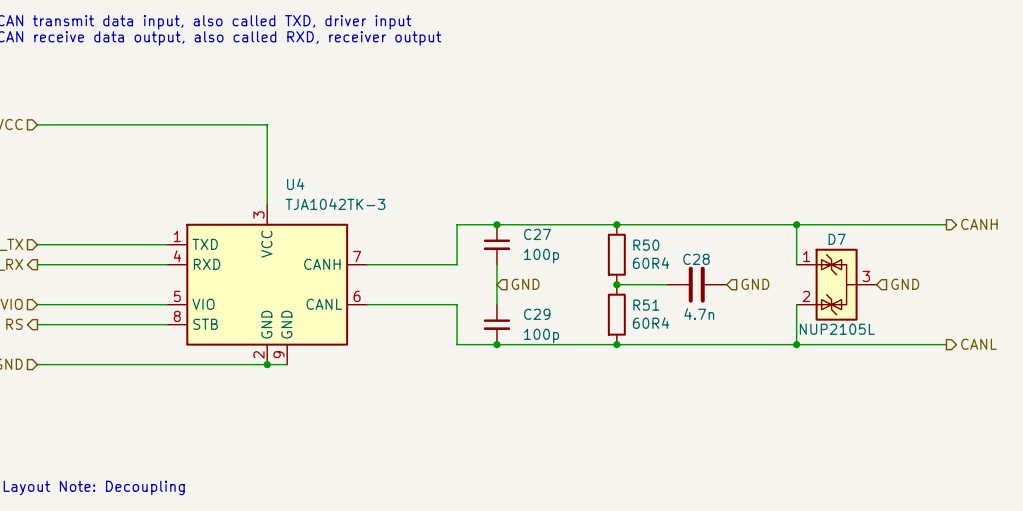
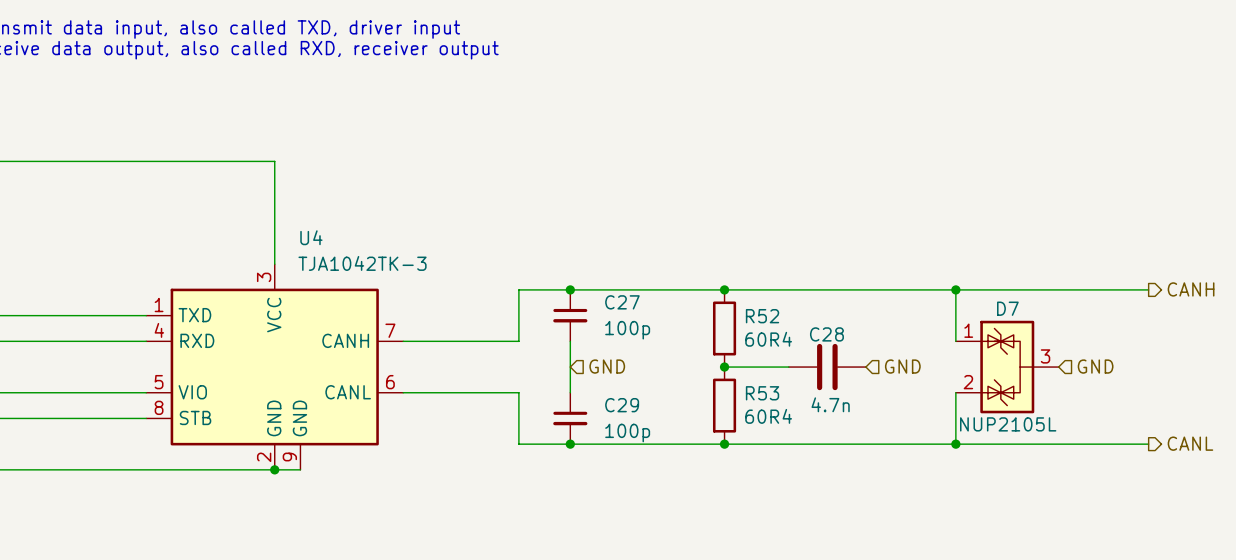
R50 name: R50 (646, 245) -> R52 (762, 316)
R51 name: R51 (646, 305) -> R53 (762, 393)

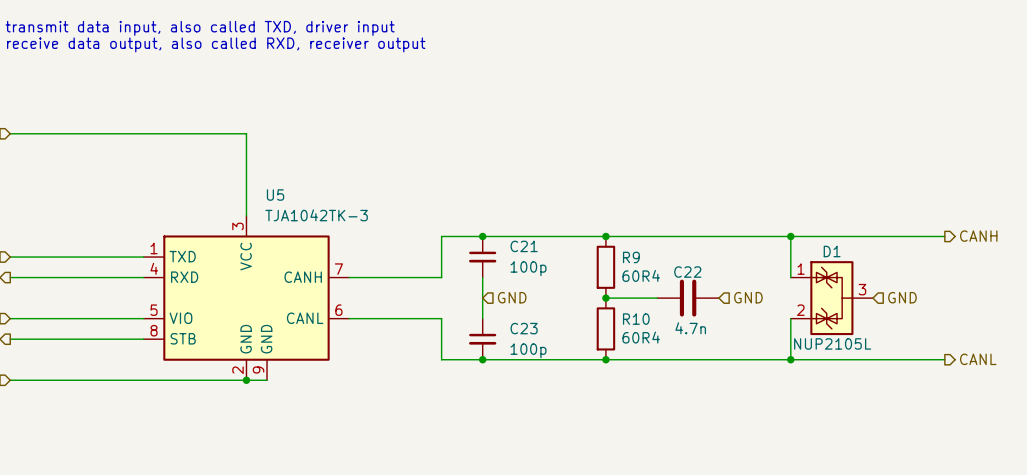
U4 name: U4 (311, 237) -> U5 (275, 195)
C27 name: C27 (622, 302) -> C21 (524, 246)
D7 name: D7 (1007, 308) -> D1 (832, 251)
R52 name: R52 (762, 316) -> R9 (631, 257)
C28 name: C28 (826, 334) -> C22 (687, 272)
R53 name: R53 (762, 393) -> R10 (636, 319)
C29 name: C29 (622, 405) -> C23 (524, 328)

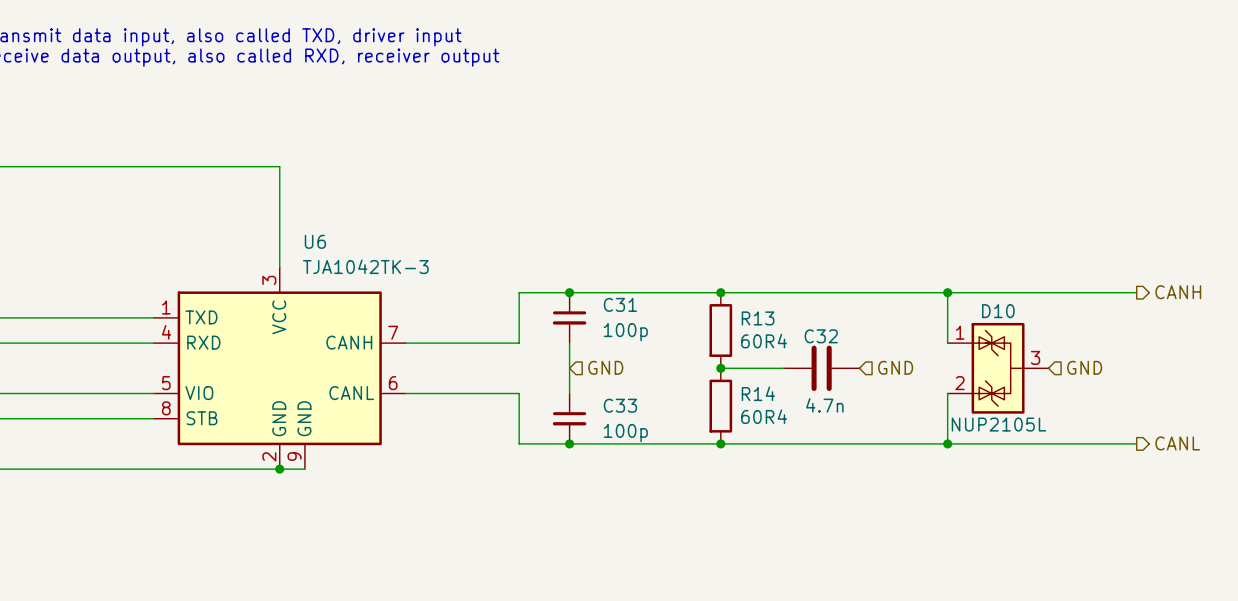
U5 name: U5 (275, 195) -> U6 (315, 241)
C21 name: C21 (524, 246) -> C31 (620, 304)
D1 name: D1 (832, 251) -> D10 (998, 311)
R9 name: R9 (631, 257) -> R13 (758, 318)
C22 name: C22 (687, 272) -> C32 (821, 336)
R10 name: R10 (636, 319) -> R14 (758, 393)
C23 name: C23 (524, 328) -> C33 (620, 405)

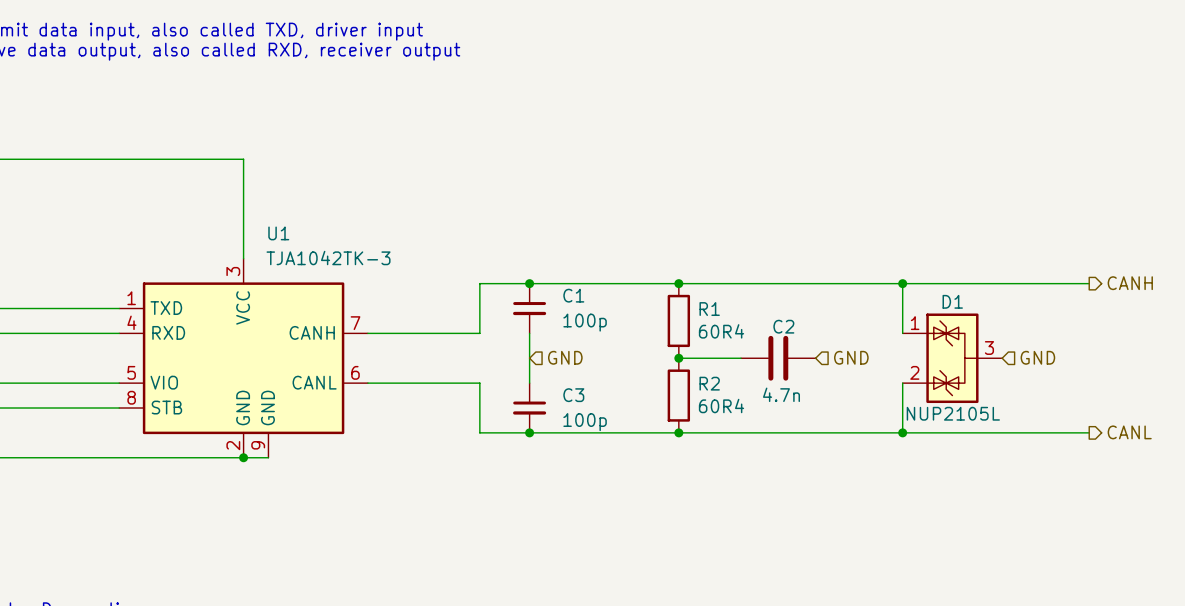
U6 name: U6 (315, 241) -> U1 (278, 233)
C31 name: C31 (620, 304) -> C1 (573, 295)
D10 name: D10 (998, 311) -> D1 (952, 301)
R13 name: R13 (758, 318) -> R1 (709, 309)
C32 name: C32 (821, 336) -> C2 (783, 326)
R14 name: R14 (758, 393) -> R2 (709, 383)
C33 name: C33 (620, 405) -> C3 (573, 395)

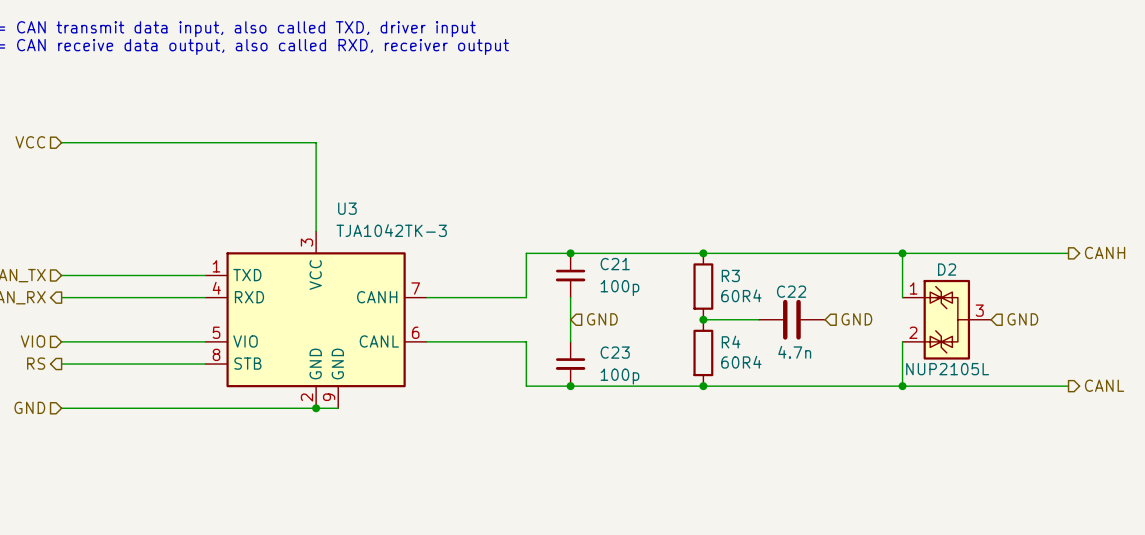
U1 name: U1 (278, 233) -> U3 (347, 208)
C1 name: C1 (573, 295) -> C21 (615, 264)
D1 name: D1 (952, 301) -> D2 (947, 269)
R1 name: R1 (709, 309) -> R3 (730, 275)
C2 name: C2 (783, 326) -> C22 (791, 291)
R2 name: R2 (709, 383) -> R4 (731, 342)
C3 name: C3 (573, 395) -> C23 (615, 352)

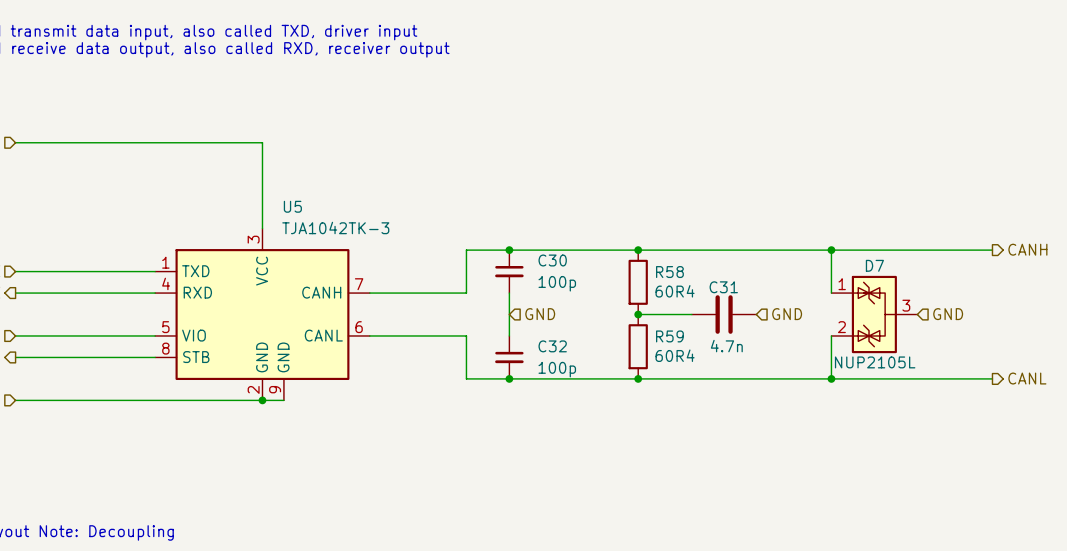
U3 name: U3 (347, 208) -> U5 (292, 206)
C21 name: C21 (615, 264) -> C30 (552, 260)
D2 name: D2 (947, 269) -> D7 (874, 265)
R3 name: R3 (730, 275) -> R58 (669, 272)
C22 name: C22 (791, 291) -> C31 (723, 287)
R4 name: R4 (731, 342) -> R59 (669, 336)
C23 name: C23 (615, 352) -> C32 (552, 346)

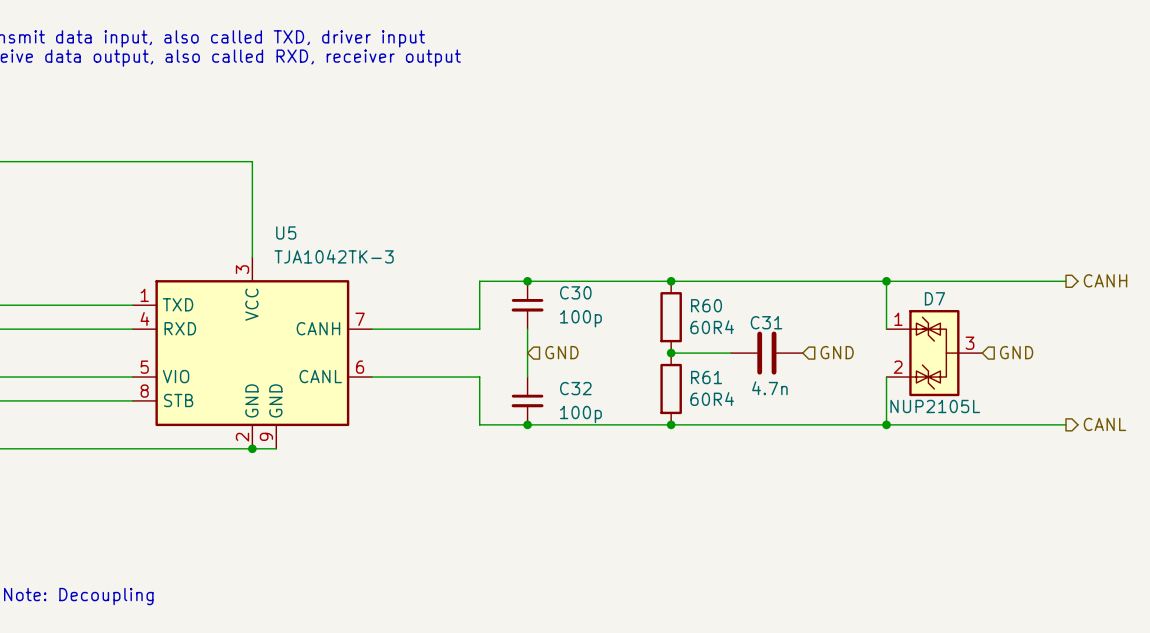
R58 name: R58 (669, 272) -> R60 (706, 305)
R59 name: R59 (669, 336) -> R61 (706, 377)

